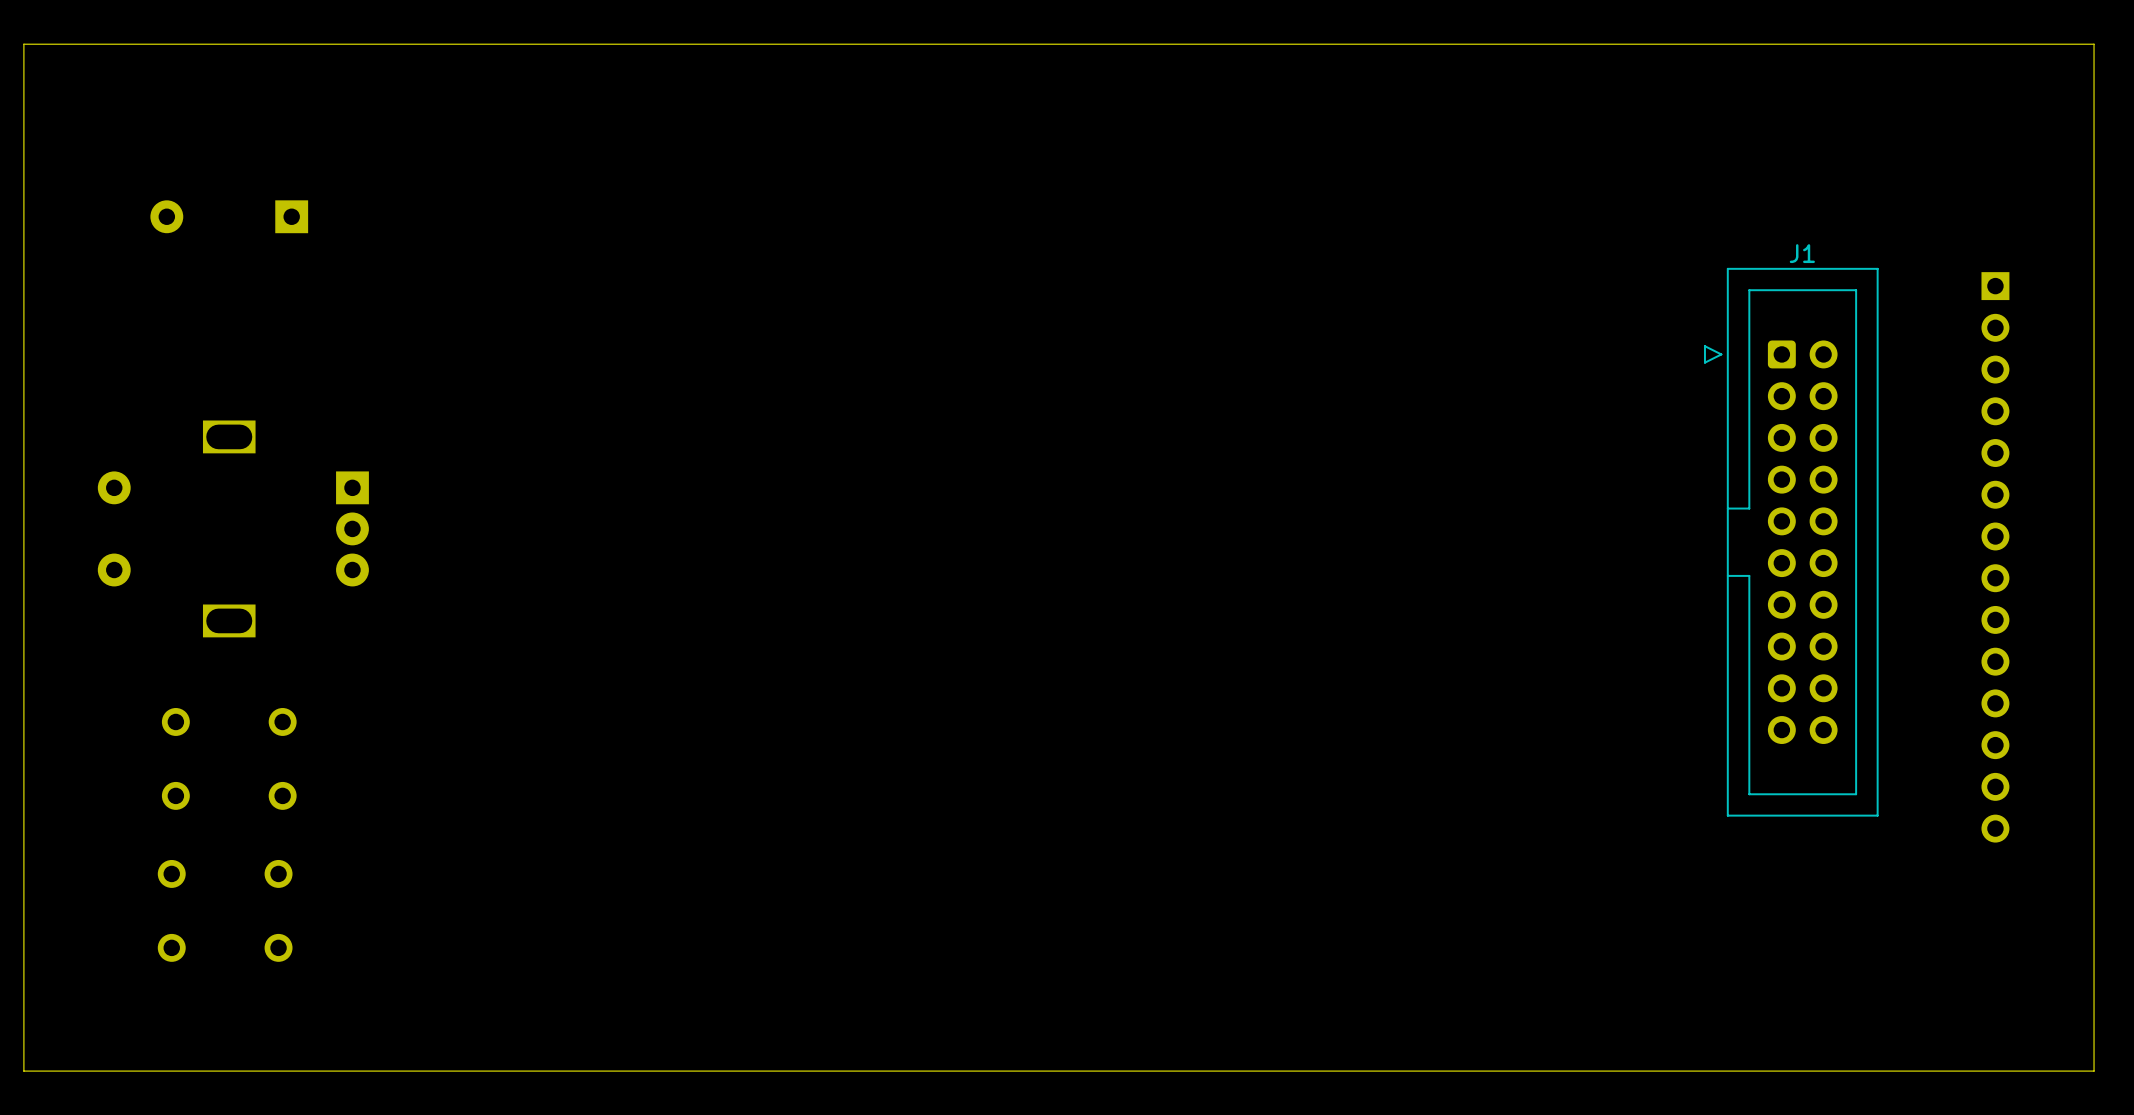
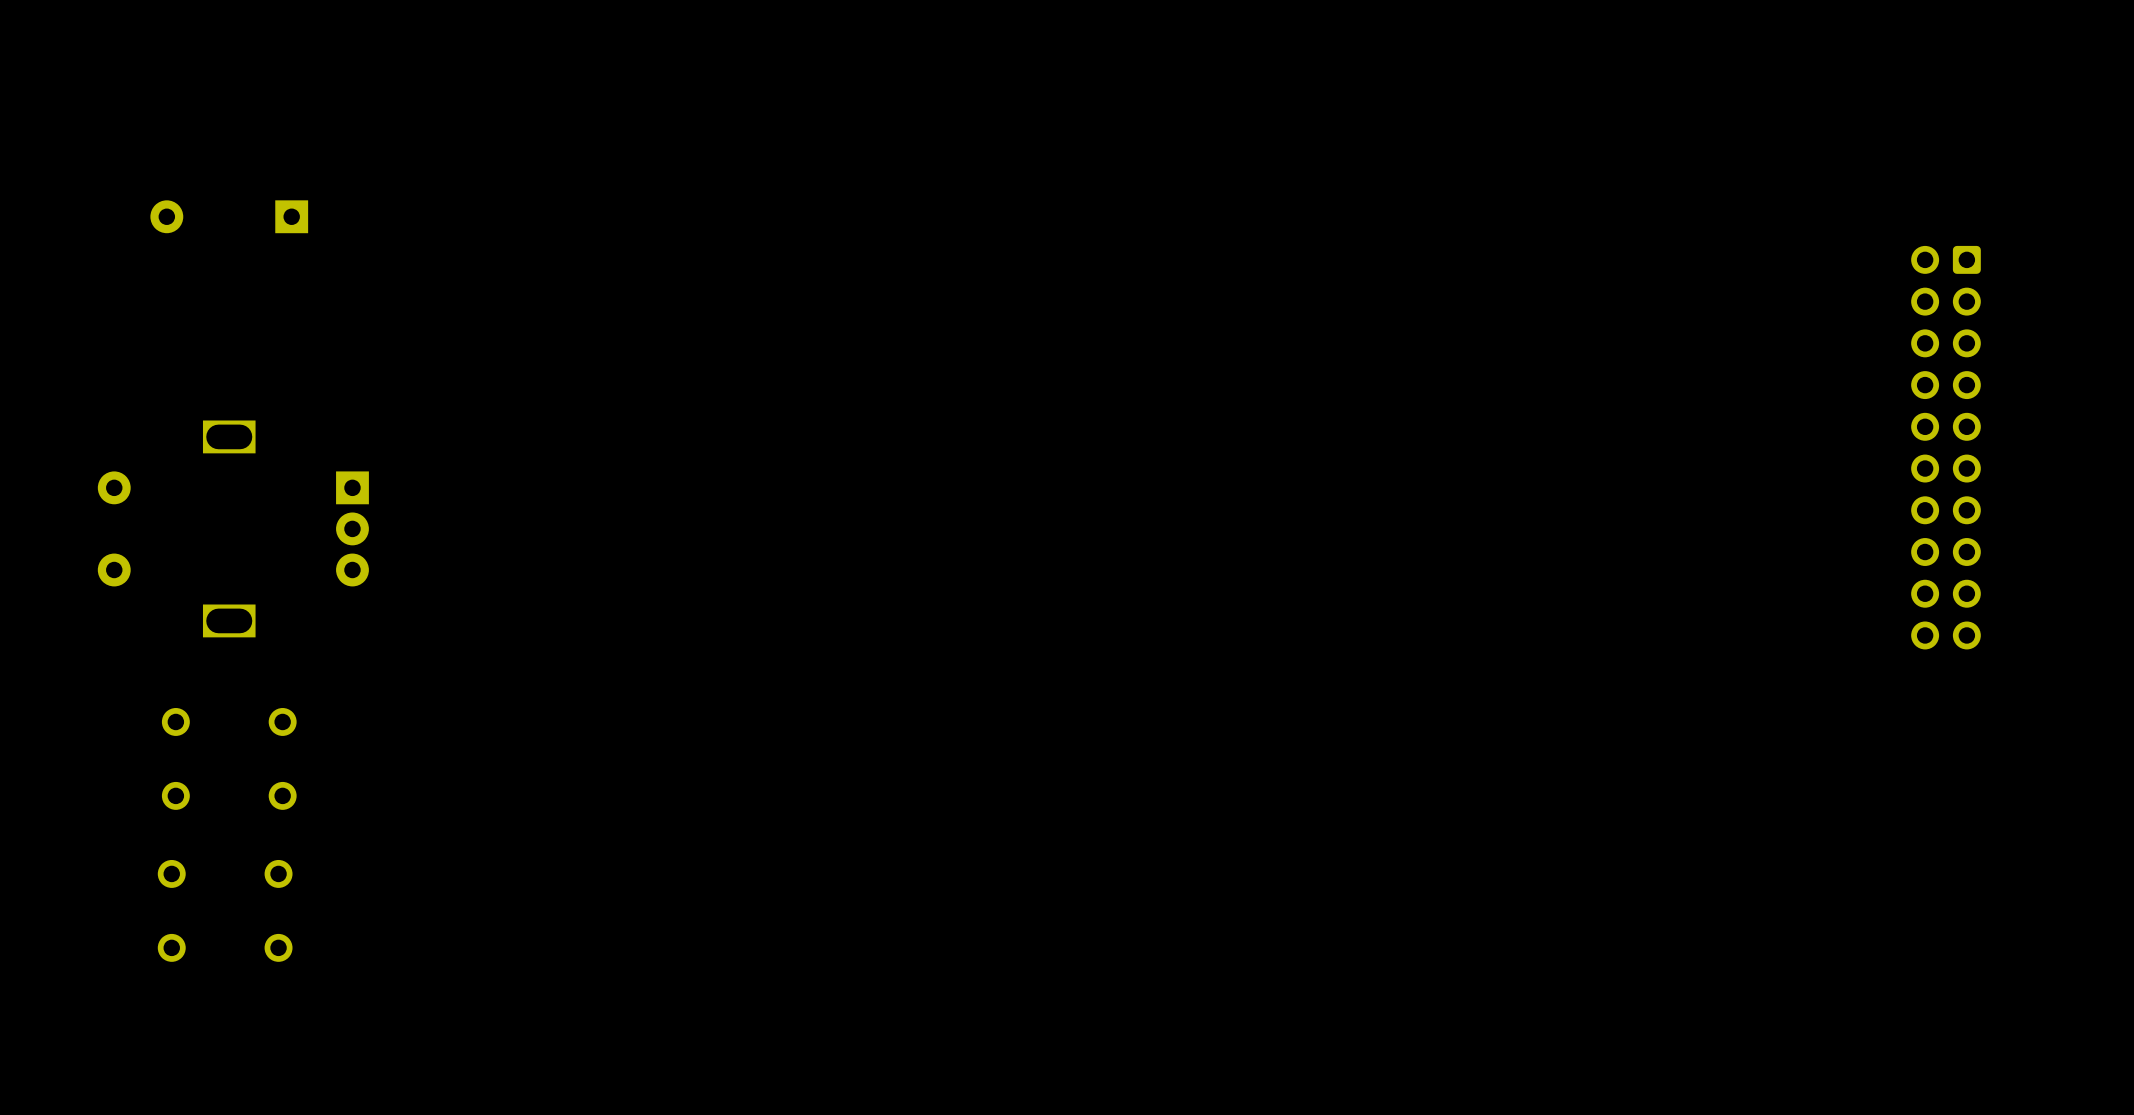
board edge: (2094, 44) (23, 44) (23, 1071) (2094, 1071) (2094, 44) -> none
J1 side: bottom (1791, 542) -> top (1945, 447)
part: (1995, 557) -> none

